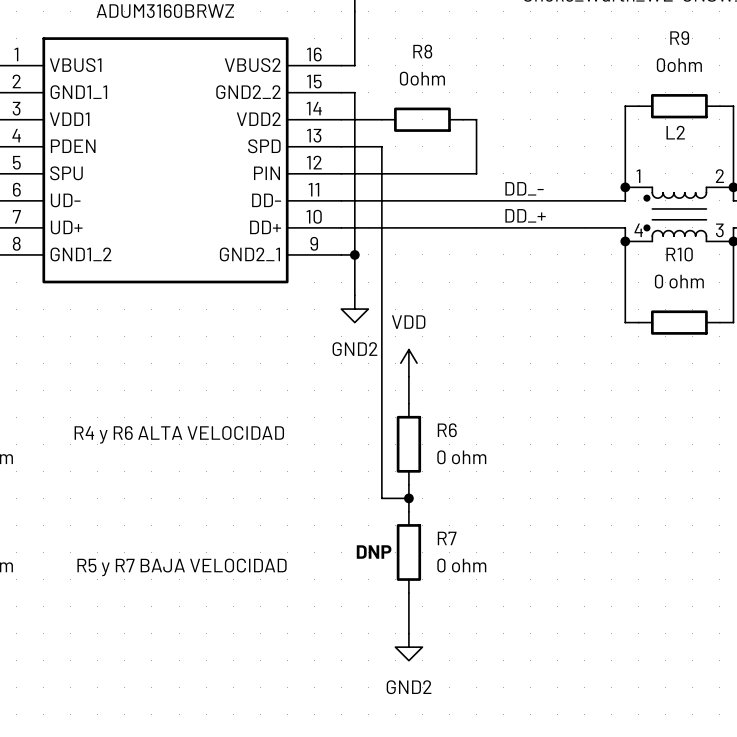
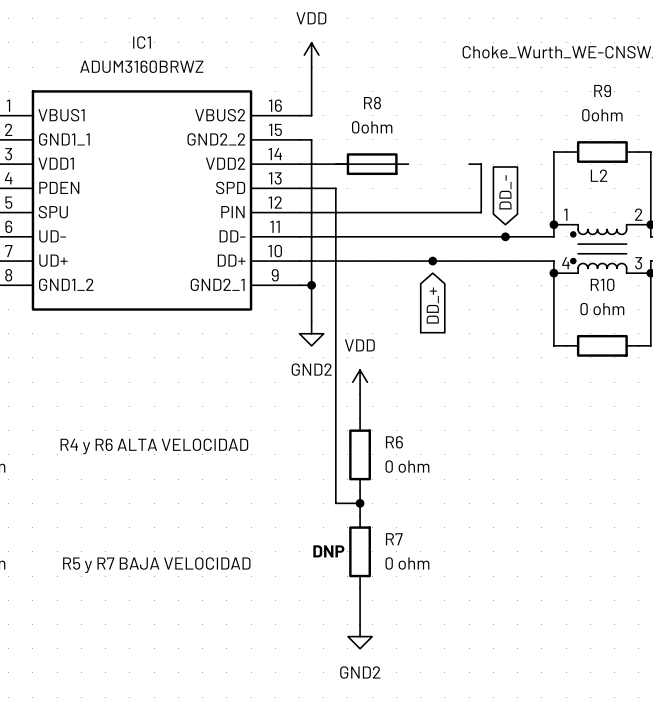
wire: none -> (335, 164) (396, 164)
wire: (463, 119) (476, 119) (476, 173) -> (469, 164) (481, 164) (481, 212) (420, 212)
global label: none -> DD_- (505, 192)
label: DD_- (524, 188) -> none
junction: none -> (505, 236)
label: DD_+ (525, 215) -> none
junction: none -> (432, 261)
global label: none -> DD_+ (432, 305)

